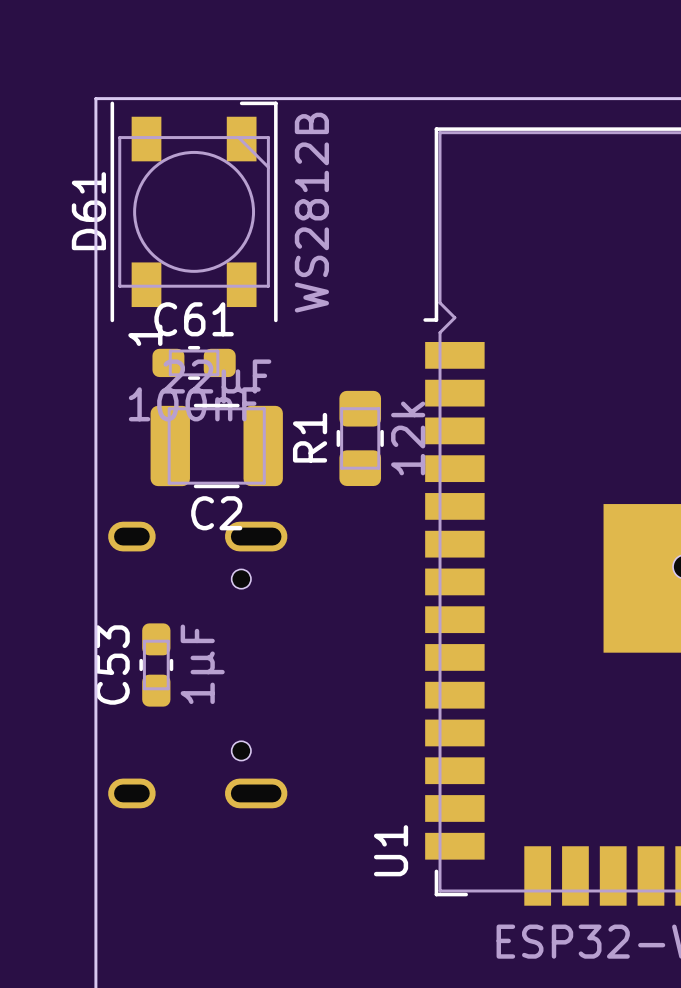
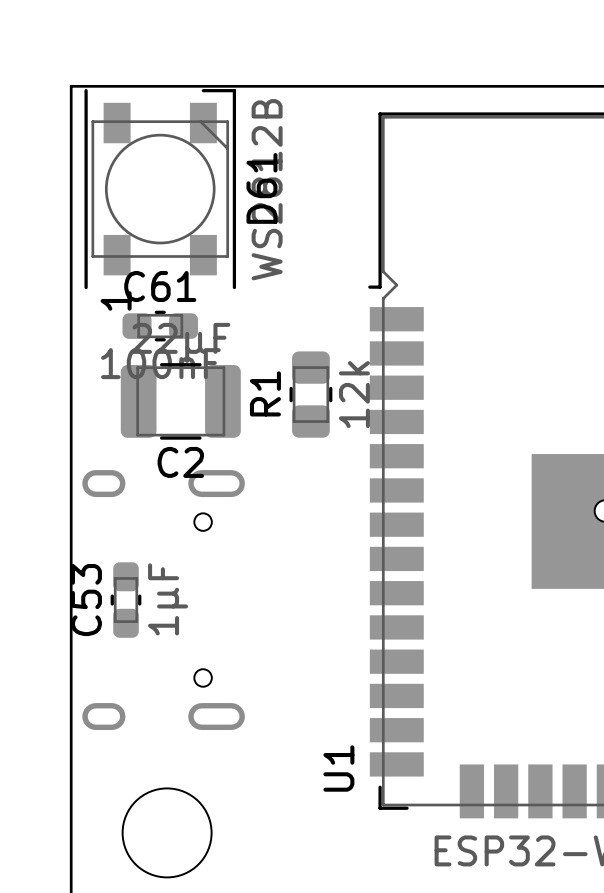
D61 name position: D61 (88, 211) -> D61 (261, 188)
round board edge: none -> [121, 787, 213, 879]

